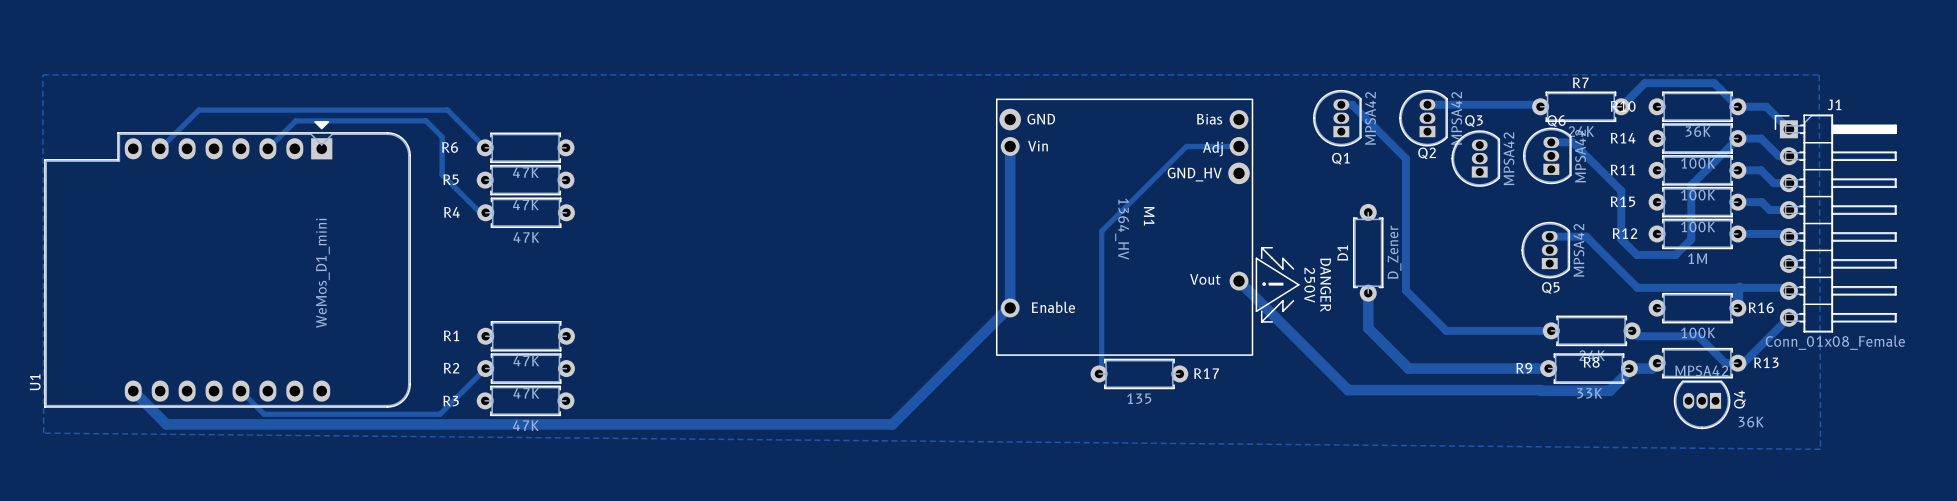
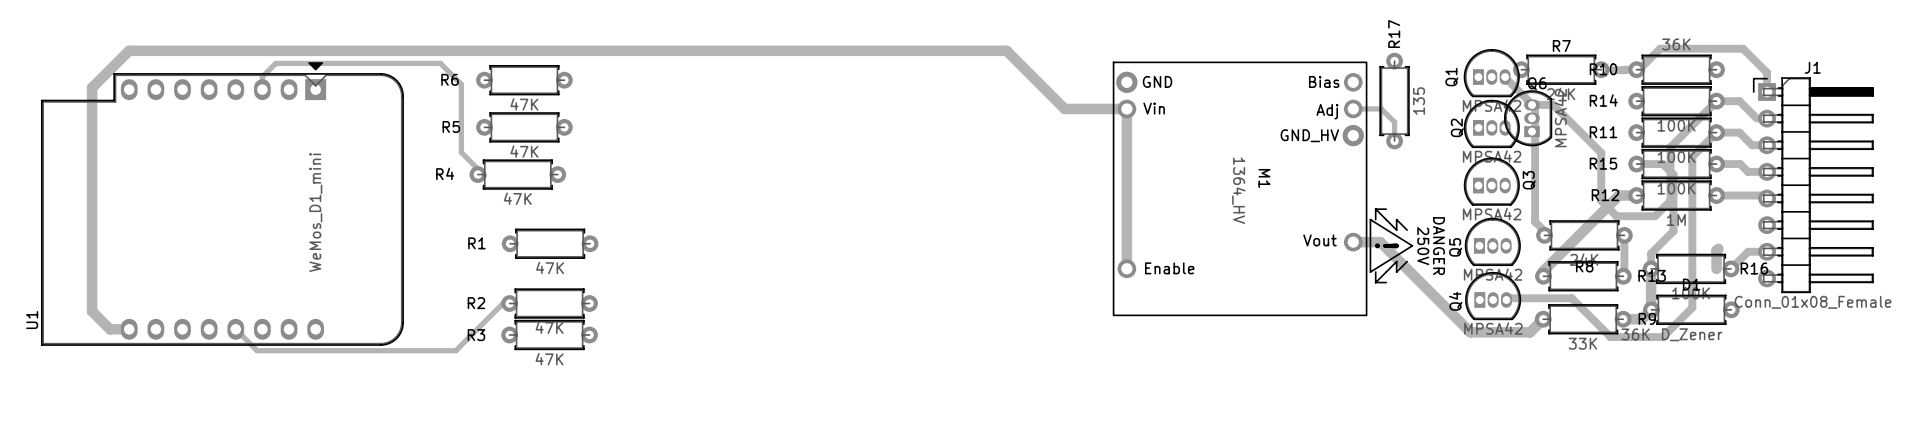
zone outline: (42, 74) (43, 433) (1820, 449) (1819, 74) (42, 74) -> none
track: (1341, 104) (1352, 104) (1405, 158) (1405, 290) (1446, 330) (1551, 330) -> none
track: (1427, 104) (1538, 104) (1540, 106) -> none
track: (1621, 106) (1644, 83) (1714, 83) (1737, 106) (1766, 106) (1788, 129) -> (1613, 70) (1639, 69) (1660, 48) (1743, 48) (1767, 72) (1767, 91)
track: none -> (1505, 77) (1535, 107) (1535, 221) (1544, 231) (1544, 235)
Q1 rotation: 0° (1337, 118) -> 90° clockwise (1491, 73)
Q1 position: (1337, 118) -> (1491, 73)
Q2 rotation: 0° (1423, 118) -> 90° clockwise (1491, 123)
Q2 position: (1423, 118) -> (1491, 123)
track: none -> (262, 89) (262, 76) (275, 63) (440, 63) (461, 84) (461, 152) (484, 175)
R10 value position: 36K (1698, 131) -> 36K (1676, 44)
track: (1010, 146) (1010, 307) (892, 424) (166, 424) (133, 391) -> none
track: none -> (1353, 108) (1381, 108) (1394, 122) (1394, 141)
track: (485, 147) (447, 110) (198, 110) (160, 148) -> none
R6 position: (525, 147) -> (524, 80)
track: (1240, 147) (1186, 146) (1101, 231) (1101, 371) (1099, 373) -> none
track: (267, 148) (295, 120) (425, 120) (442, 137) (442, 174) (480, 212) (485, 212) -> none
Q3 rotation: 0° (1475, 158) -> 90° clockwise (1491, 181)
Q3 position: (1475, 158) -> (1491, 181)
track: none -> (1716, 132) (1692, 156) (1692, 307) (1662, 337) (1610, 337) (1571, 298) (1508, 298) (1506, 299)
R5 position: (525, 180) -> (524, 127)
track: none -> (1636, 164) (1662, 164) (1673, 174) (1673, 231) (1651, 253) (1651, 309) (1642, 319) (1623, 319)
M1 position: (1147, 227) -> (1262, 188)
track: none -> (1639, 195) (1618, 195) (1543, 271) (1543, 276)
track: (1549, 236) (1586, 236) (1637, 287) (1785, 287) -> none
Q5 rotation: 0° (1545, 250) -> 90° clockwise (1492, 241)
Q5 position: (1545, 250) -> (1492, 241)
D1 rotation: 0° (1368, 252) -> 90° clockwise (1691, 309)
D1 position: (1368, 252) -> (1691, 309)
U1 position: (227, 264) -> (222, 203)
track: none -> (1624, 235) (1623, 276)
track: (1239, 281) (1348, 390) (1609, 390) (1632, 368) (1651, 368) (1659, 363) -> none
track: none -> (1353, 242) (1380, 242) (1470, 332) (1530, 332) (1543, 319)
track: none -> (1767, 251) (1748, 251) (1730, 268)
track: (1368, 293) (1368, 328) (1408, 368) (1551, 368) -> none
track: none -> (1126, 268) (1126, 108) (1064, 108) (1006, 50) (129, 50) (92, 87) (92, 311) (110, 329) (129, 329)
R16 position: (1697, 308) -> (1691, 268)
track: (1788, 317) (1743, 363) (1725, 363) (1698, 336) (1637, 336) (1632, 330) -> none
R8 position: (1591, 330) -> (1584, 235)
R1 position: (526, 336) -> (550, 243)
track: none -> (509, 303) (503, 303) (477, 328)
R13 position: (1697, 363) -> (1583, 276)
R2 position: (526, 368) -> (549, 303)
R9 name position: R9 (1524, 368) -> R9 (1647, 318)
R9 position: (1589, 368) -> (1583, 319)
R17 rotation: 0° (1139, 373) -> 90° clockwise (1394, 101)
R17 position: (1139, 373) -> (1394, 101)
R17 name position: R17 (1206, 373) -> R17 (1394, 33)
track: (463, 390) (439, 414) (264, 414) (240, 391) -> (455, 350) (257, 350) (235, 329)
R17 value position: 135 (1139, 398) -> 135 (1419, 101)
R3 position: (525, 400) -> (549, 334)
Q4 rotation: 0° (1702, 404) -> 180° (1493, 296)
Q4 position: (1702, 404) -> (1493, 296)

